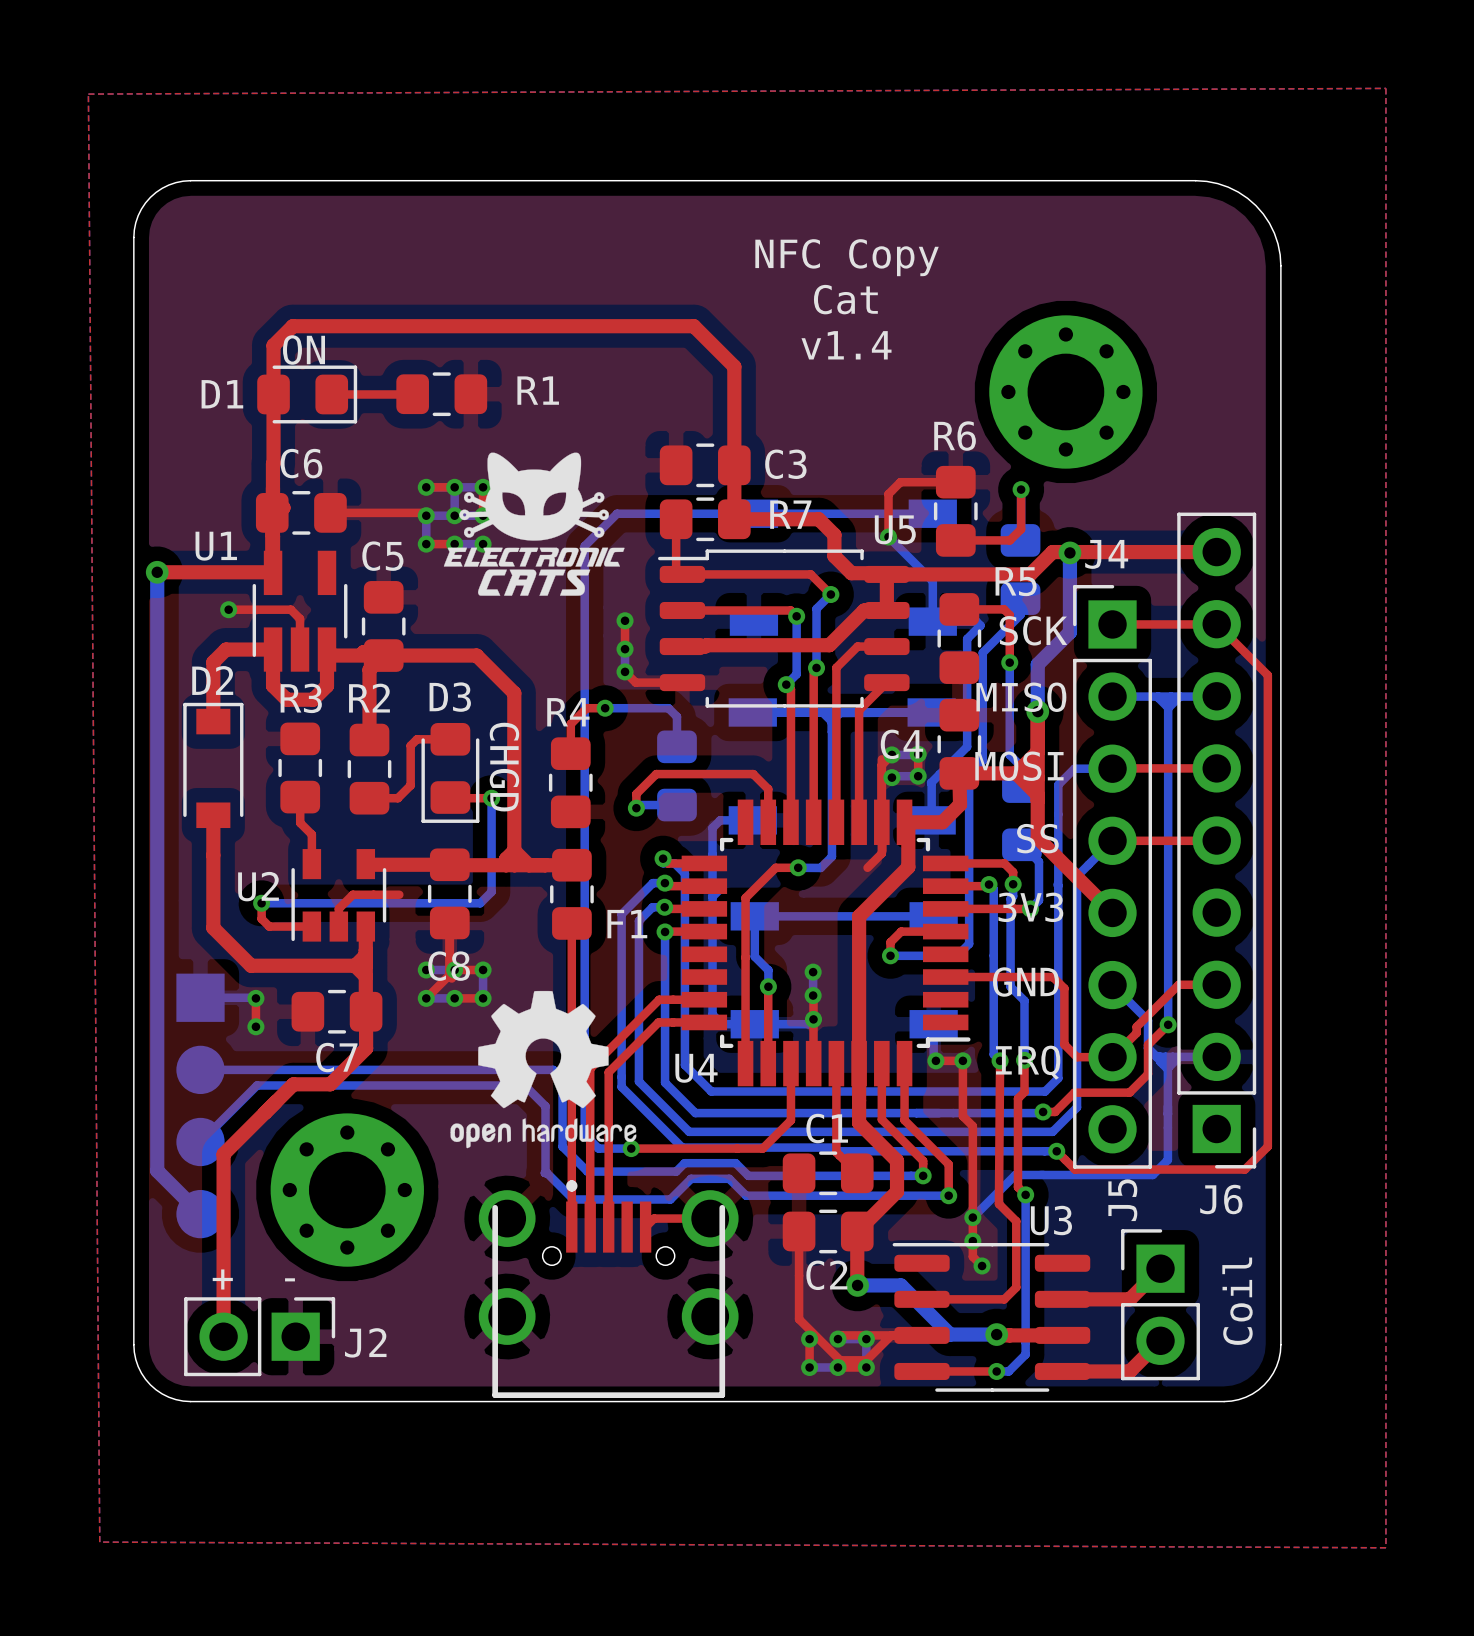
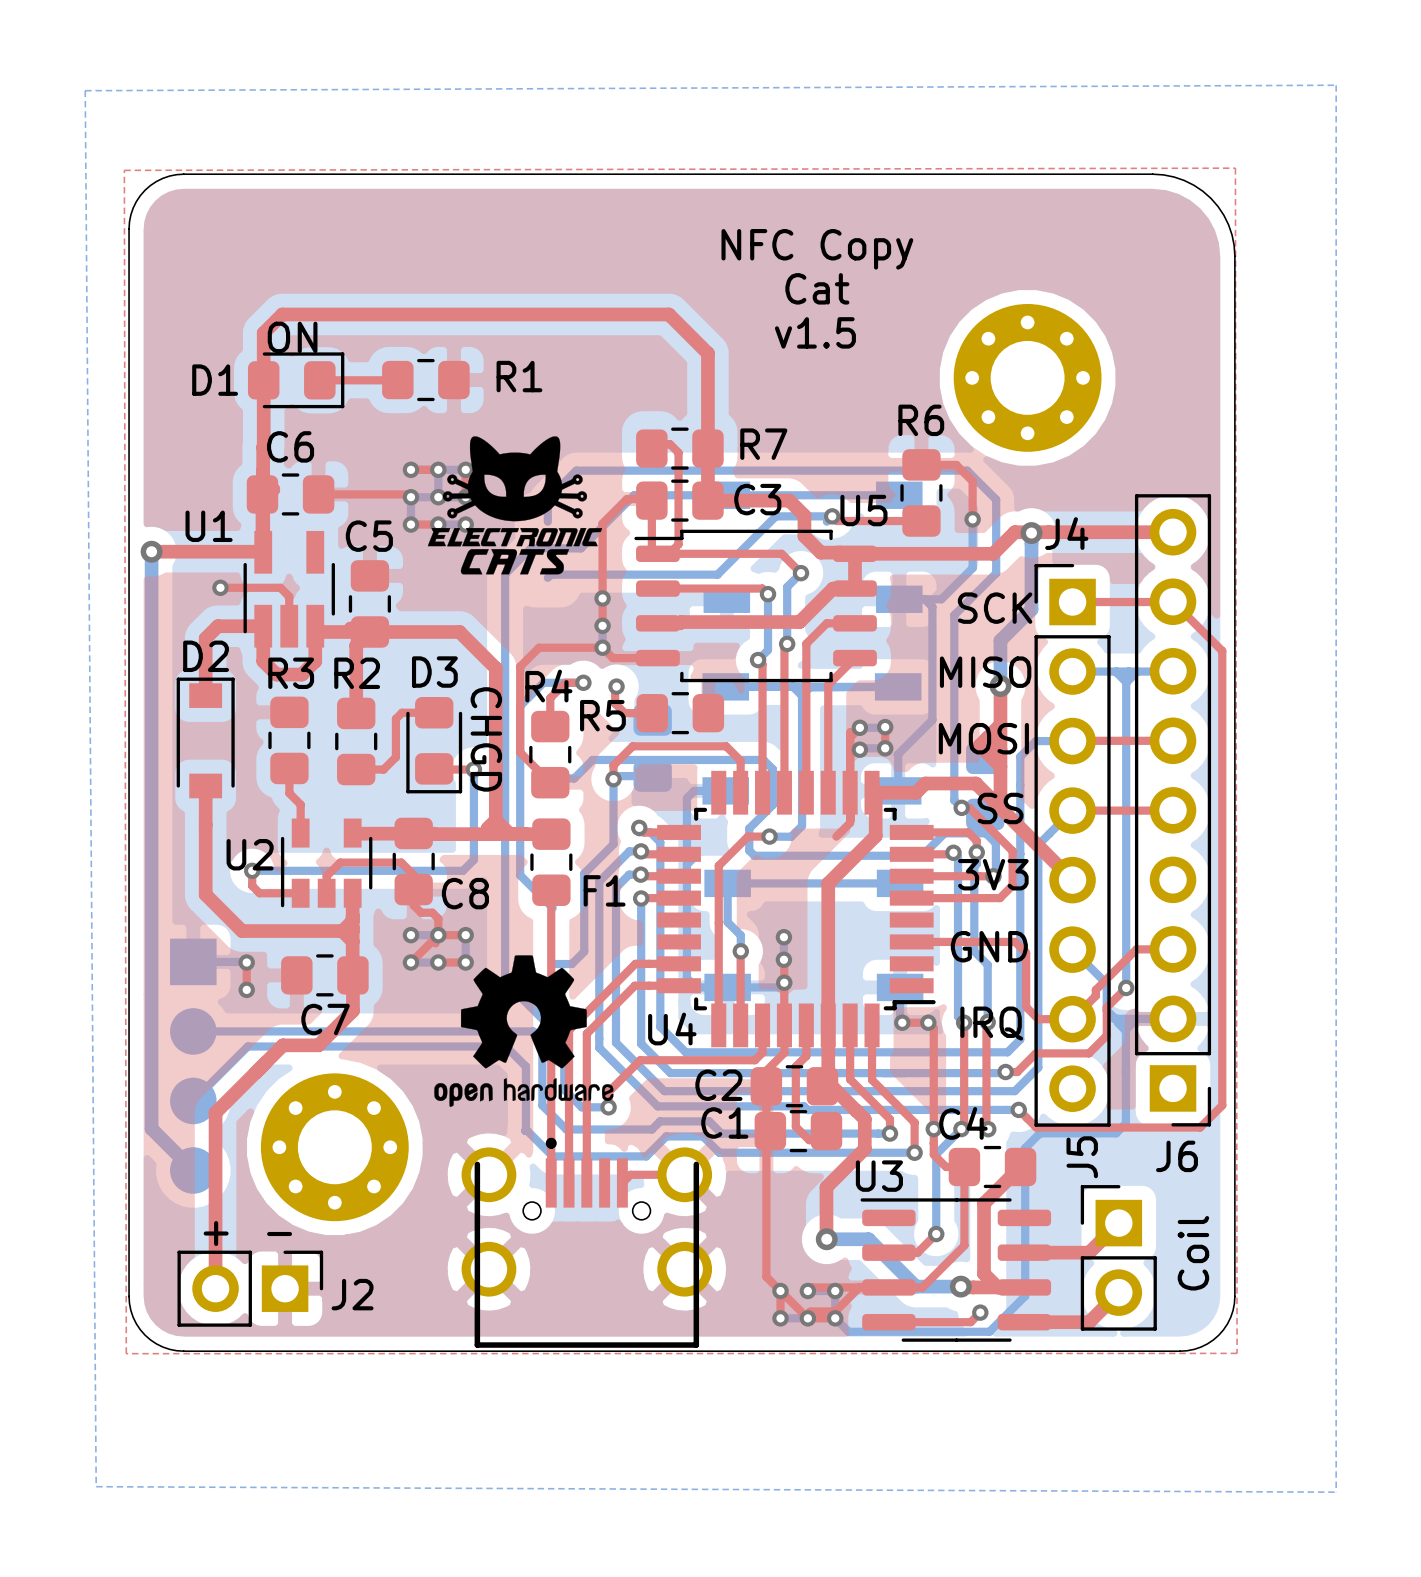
top zone outline: (1385, 88) (88, 94) (99, 1542) (1385, 1547) (1385, 88) -> (1235, 168) (124, 170) (126, 1353) (1237, 1353) (1235, 168)
text: v1.4 (846, 345) -> v1.5 (815, 332)
top track: none -> (651, 444) (670, 444) (678, 452) (678, 544) (669, 553)
C3 name: C3 (785, 464) -> R7 (763, 444)
top track: (955, 482) (900, 482) (888, 494) (888, 537) -> (921, 464) (956, 464) (972, 481) (972, 519)
top track: (1021, 489) (1021, 529) (1009, 540) (955, 540) -> (832, 516) (836, 521) (921, 521)
via position: (1021, 489) -> (972, 519)
bottom track: (657, 513) (617, 513) (584, 546) (584, 1134) (598, 1148) (603, 1148) -> (634, 495) (580, 548) (530, 548) (505, 574) (505, 981) (564, 1040) (564, 1089) (581, 1107)
R7 name: R7 (790, 514) -> C3 (757, 499)
top track: none -> (651, 499) (626, 499) (602, 523) (602, 598)
bottom track: (888, 537) (932, 581) (932, 621) -> none
via position: (888, 537) -> (832, 516)
bottom track: none -> (972, 519) (972, 568) (941, 599)
bottom track: none -> (547, 521) (547, 499) (576, 470) (967, 470) (996, 499) (996, 573) (954, 615) (954, 800) (961, 807)
bottom track: none -> (826, 521) (832, 516) (775, 516) (717, 574) (550, 574) (547, 577)
part: (1020, 569) -> none
R5 name position: R5 (1016, 581) -> R5 (602, 715)
bottom track: (1020, 598) (1020, 614) (982, 652) (982, 760) (969, 774) (969, 943) (957, 955) (890, 955) -> none
top track: (959, 609) (1004, 609) (1009, 615) (1009, 662) -> none
bottom track: (976, 621) (980, 625) (967, 638) -> (924, 599) (932, 606) (932, 615)
R5 rotation: 0° (959, 638) -> 90° clockwise (680, 713)
R5 position: (959, 638) -> (680, 713)
bottom track: (1009, 662) (1009, 754) (1021, 767) (1021, 786) -> none
via: (1009, 662) -> none
top track: none -> (602, 647) (539, 647) (520, 666) (520, 752) (550, 782)
bottom track: (605, 708) (668, 708) (676, 716) (676, 746) -> (583, 682) (543, 682) (520, 706) (520, 875) (552, 907)
top track: none -> (616, 686) (615, 703) (624, 713) (652, 713)
via: none -> (616, 686)
C4 rotation: 0° (959, 744) -> 90° clockwise (992, 1166)
C4 position: (959, 744) -> (992, 1166)
top track: (1016, 773) (959, 773) (960, 804) (942, 822) -> (1000, 808) (975, 783) (925, 783) (916, 792) (908, 792)
bottom track: none -> (613, 779) (613, 844) (584, 873) (584, 951) (571, 964) (552, 964)
via: none -> (961, 807)
bottom track: (1021, 844) (1038, 861) (1038, 900) (1033, 906) -> (550, 778) (574, 778) (592, 759) (763, 759) (772, 769) (772, 804) (749, 828) (749, 850) (754, 855) (922, 855) (944, 833) (985, 833) (995, 843) (995, 873)
C8 position: (449, 893) -> (413, 861)
top track: none -> (384, 862) (401, 862) (413, 874) (413, 905) (421, 912) (432, 912) (438, 918) (438, 935)
top track: (945, 931) (901, 931) (890, 942) (890, 955) -> (911, 898) (999, 898) (1012, 885) (1012, 851) (969, 807) (961, 807)
via: (890, 955) -> none
C8 name position: C8 (449, 966) -> C8 (465, 893)
top track: (962, 1060) (962, 1116) (972, 1126) (972, 1256) (982, 1265) -> (928, 1022) (933, 1028) (933, 1154) (946, 1166) (964, 1166) (964, 1245) (922, 1287) (888, 1287)
top track: (1000, 1060) (998, 1203) (1016, 1221) (1016, 1287) (1004, 1299) (951, 1299) -> (964, 1022) (964, 1126) (961, 1129)
top track: (1024, 1060) (1024, 1092) (1017, 1098) (1017, 1187) (1025, 1194) -> (987, 1022) (986, 1127) (988, 1129)
top track: none -> (784, 1025) (784, 1052) (766, 1070) (766, 1276) (807, 1318)
top track: (790, 1091) (790, 1120) (762, 1148) (631, 1148) -> (762, 1052) (754, 1060) (640, 1060) (608, 1091) (608, 1107)
top track: (836, 1095) (836, 1152) (857, 1173) -> (806, 1056) (795, 1066) (795, 1126) (809, 1140) (822, 1140)
C1 name position: C1 (827, 1128) -> C1 (724, 1122)
bottom track: (1167, 1159) (1152, 1174) (1015, 1174) (972, 1217) -> (1125, 1118) (1125, 1123) (1116, 1133) (1039, 1133) (1025, 1148) (1025, 1296) (989, 1331) (848, 1331) (835, 1318)
via: none -> (933, 1129)
bottom track: none -> (961, 1129) (936, 1154) (936, 1234)
via: none -> (961, 1129)
via: none -> (988, 1129)
bottom track: (1025, 1194) (1025, 1354) (1008, 1371) (996, 1371) -> none
via: (1025, 1194) -> none
top track: none -> (1020, 1166) (984, 1203) (984, 1273) (997, 1287)
via: (972, 1217) -> none
U3 name position: U3 (1051, 1220) -> U3 (879, 1176)
top track: (799, 1231) (799, 1319) (840, 1360) -> none
C2 position: (828, 1231) -> (794, 1086)
via: (972, 1241) -> none
via position: (982, 1265) -> (936, 1234)
C2 name position: C2 (826, 1275) -> C2 (718, 1085)
top track: none -> (936, 1234) (917, 1252)
top track: none -> (980, 1312) (970, 1322) (960, 1322)
via position: (996, 1371) -> (980, 1312)

